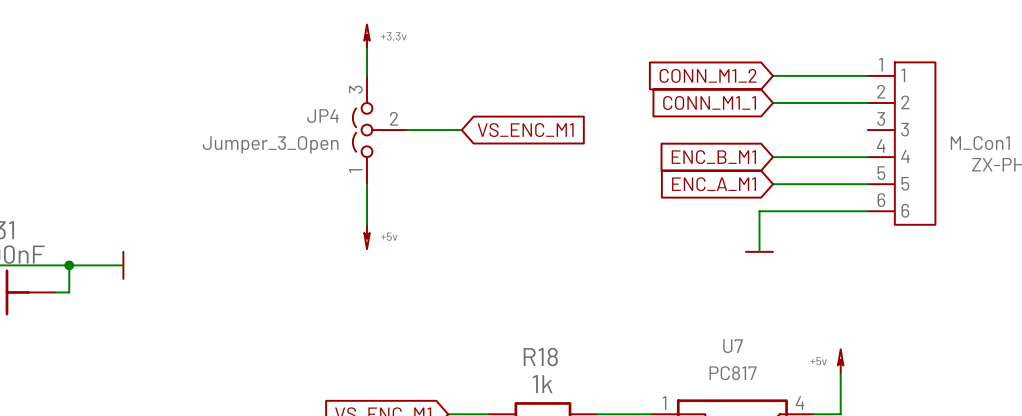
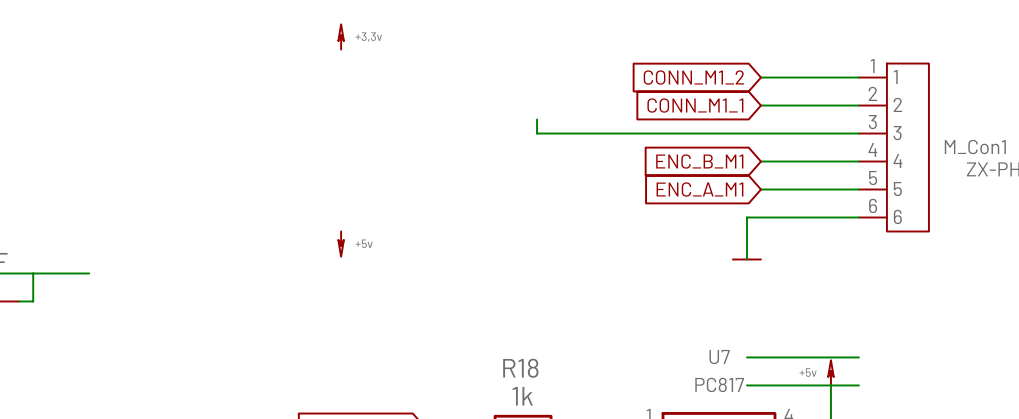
wire: (367, 48) (367, 75) -> none
wire: none -> (537, 119) (537, 133) (858, 133)
JP4: Jumper_3_Open (380, 130) -> none
wire: (407, 130) (461, 130) -> none
global label: VS_ENC_M1 (525, 130) -> none
wire: (367, 184) (367, 224) -> none
junction: (69, 265) -> none
power symbol: (123, 265) -> none
wire: none -> (746, 357) (858, 357)
wire: none -> (746, 385) (858, 385)

